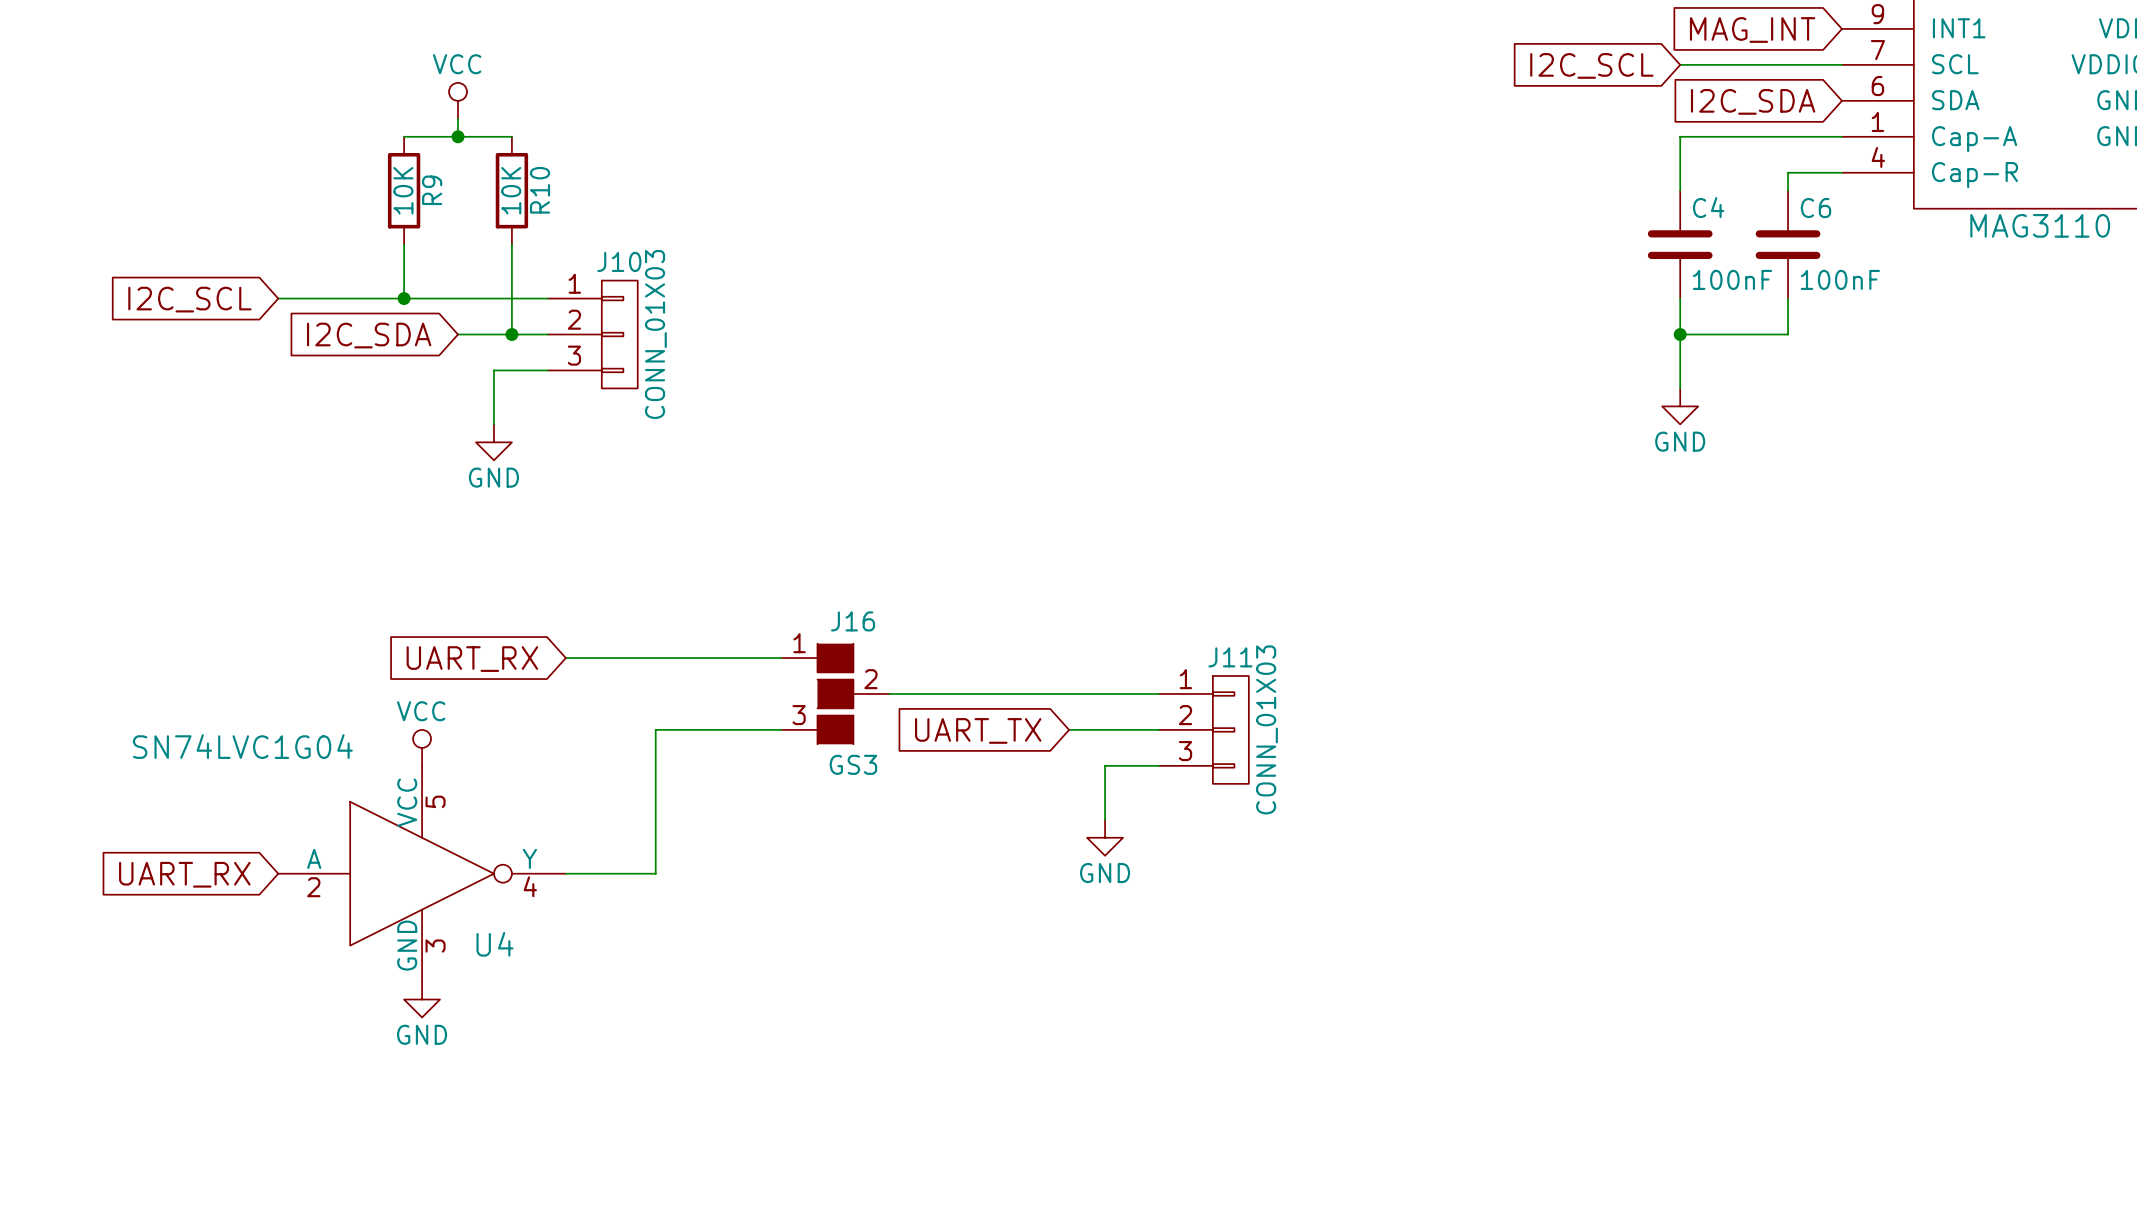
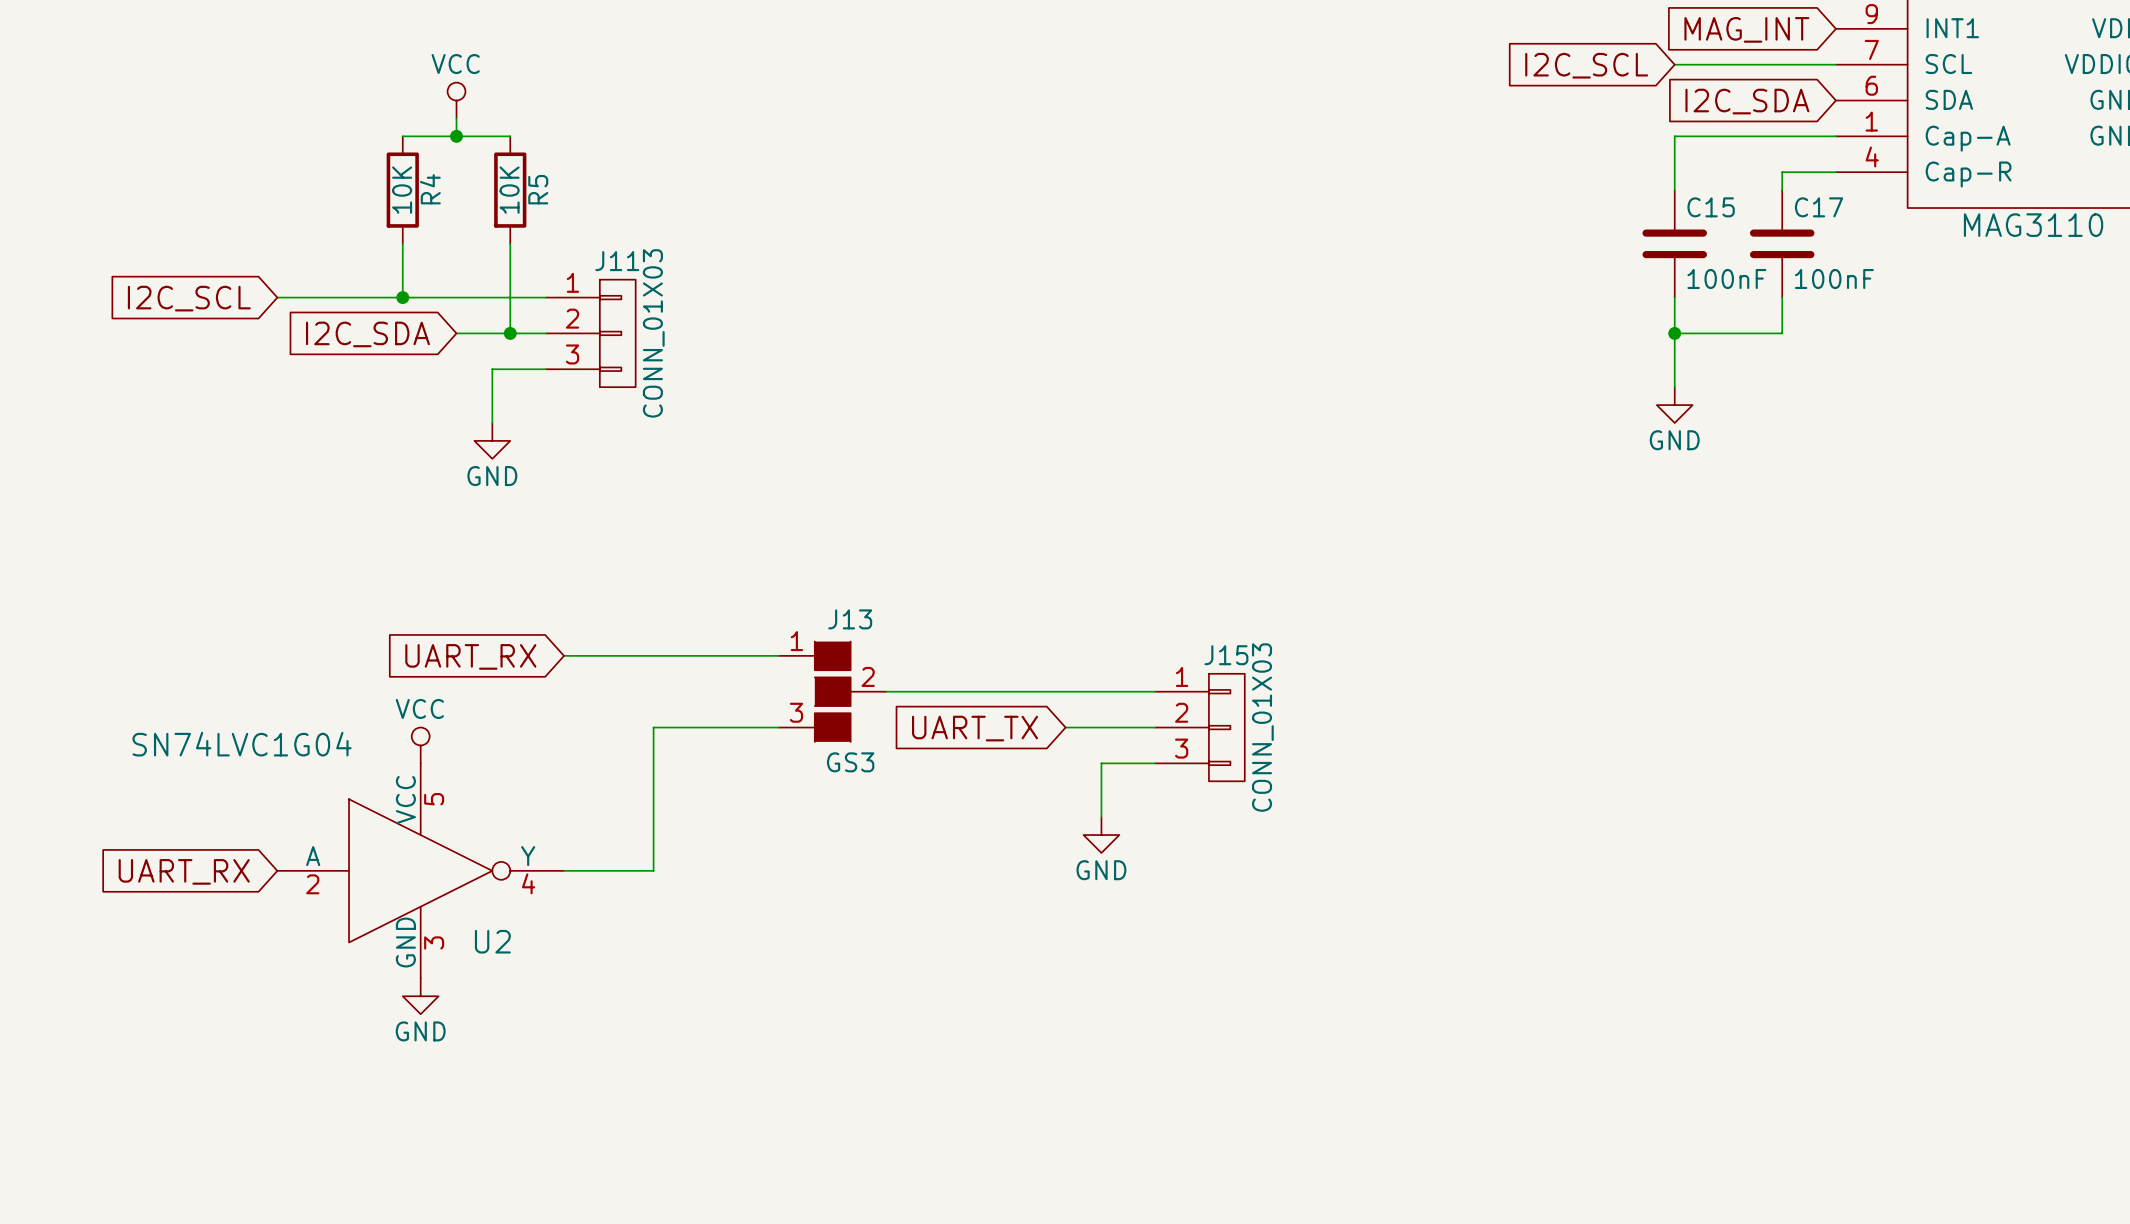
R9 name: R9 (432, 190) -> R4 (430, 189)
R10 name: R10 (540, 190) -> R5 (538, 189)
C4 name: C4 (1708, 207) -> C15 (1711, 207)
C6 name: C6 (1815, 208) -> C17 (1819, 207)
J10 name: J10 (619, 261) -> J11 (617, 261)
J16 name: J16 (853, 621) -> J13 (850, 619)
J11 name: J11 (1230, 657) -> J15 (1226, 655)
U4 name: U4 (494, 944) -> U2 (492, 941)

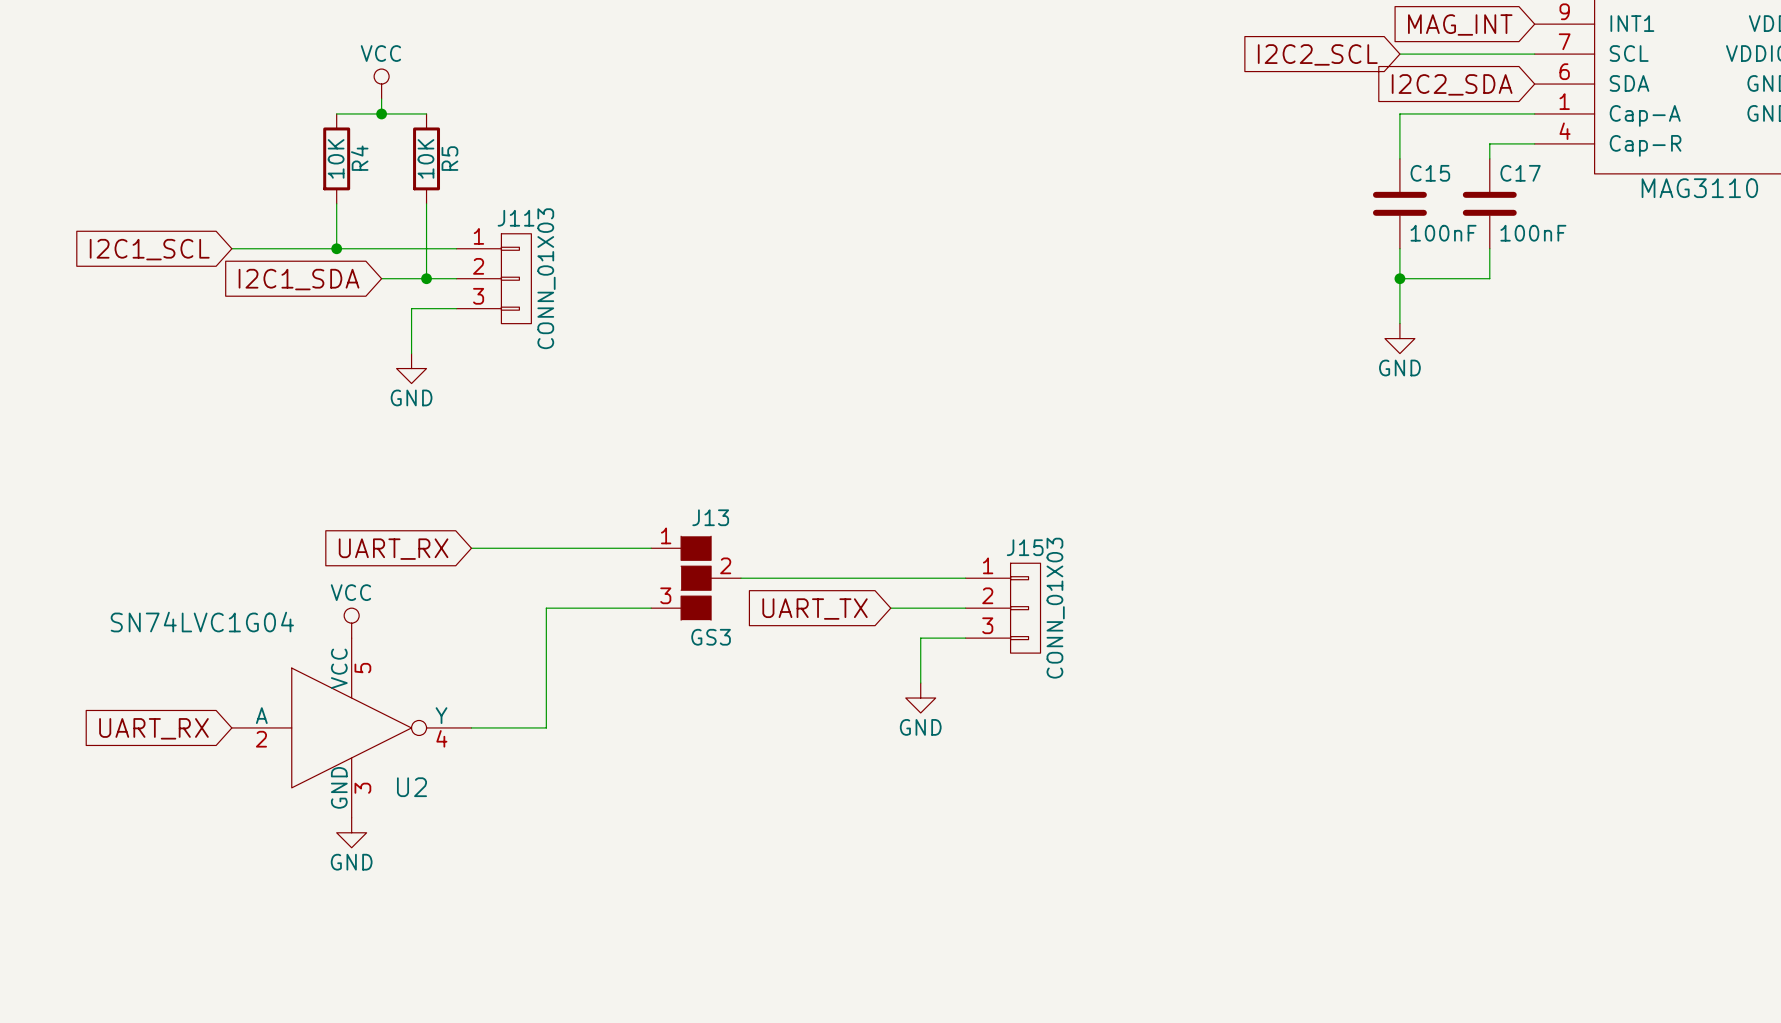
global label: I2C_SCL (1586, 65) -> I2C2_SCL (1317, 54)
global label: I2C_SDA (1747, 101) -> I2C2_SDA (1452, 84)
global label: I2C_SCL (189, 298) -> I2C1_SCL (149, 249)
global label: I2C_SDA (367, 334) -> I2C1_SDA (299, 279)

